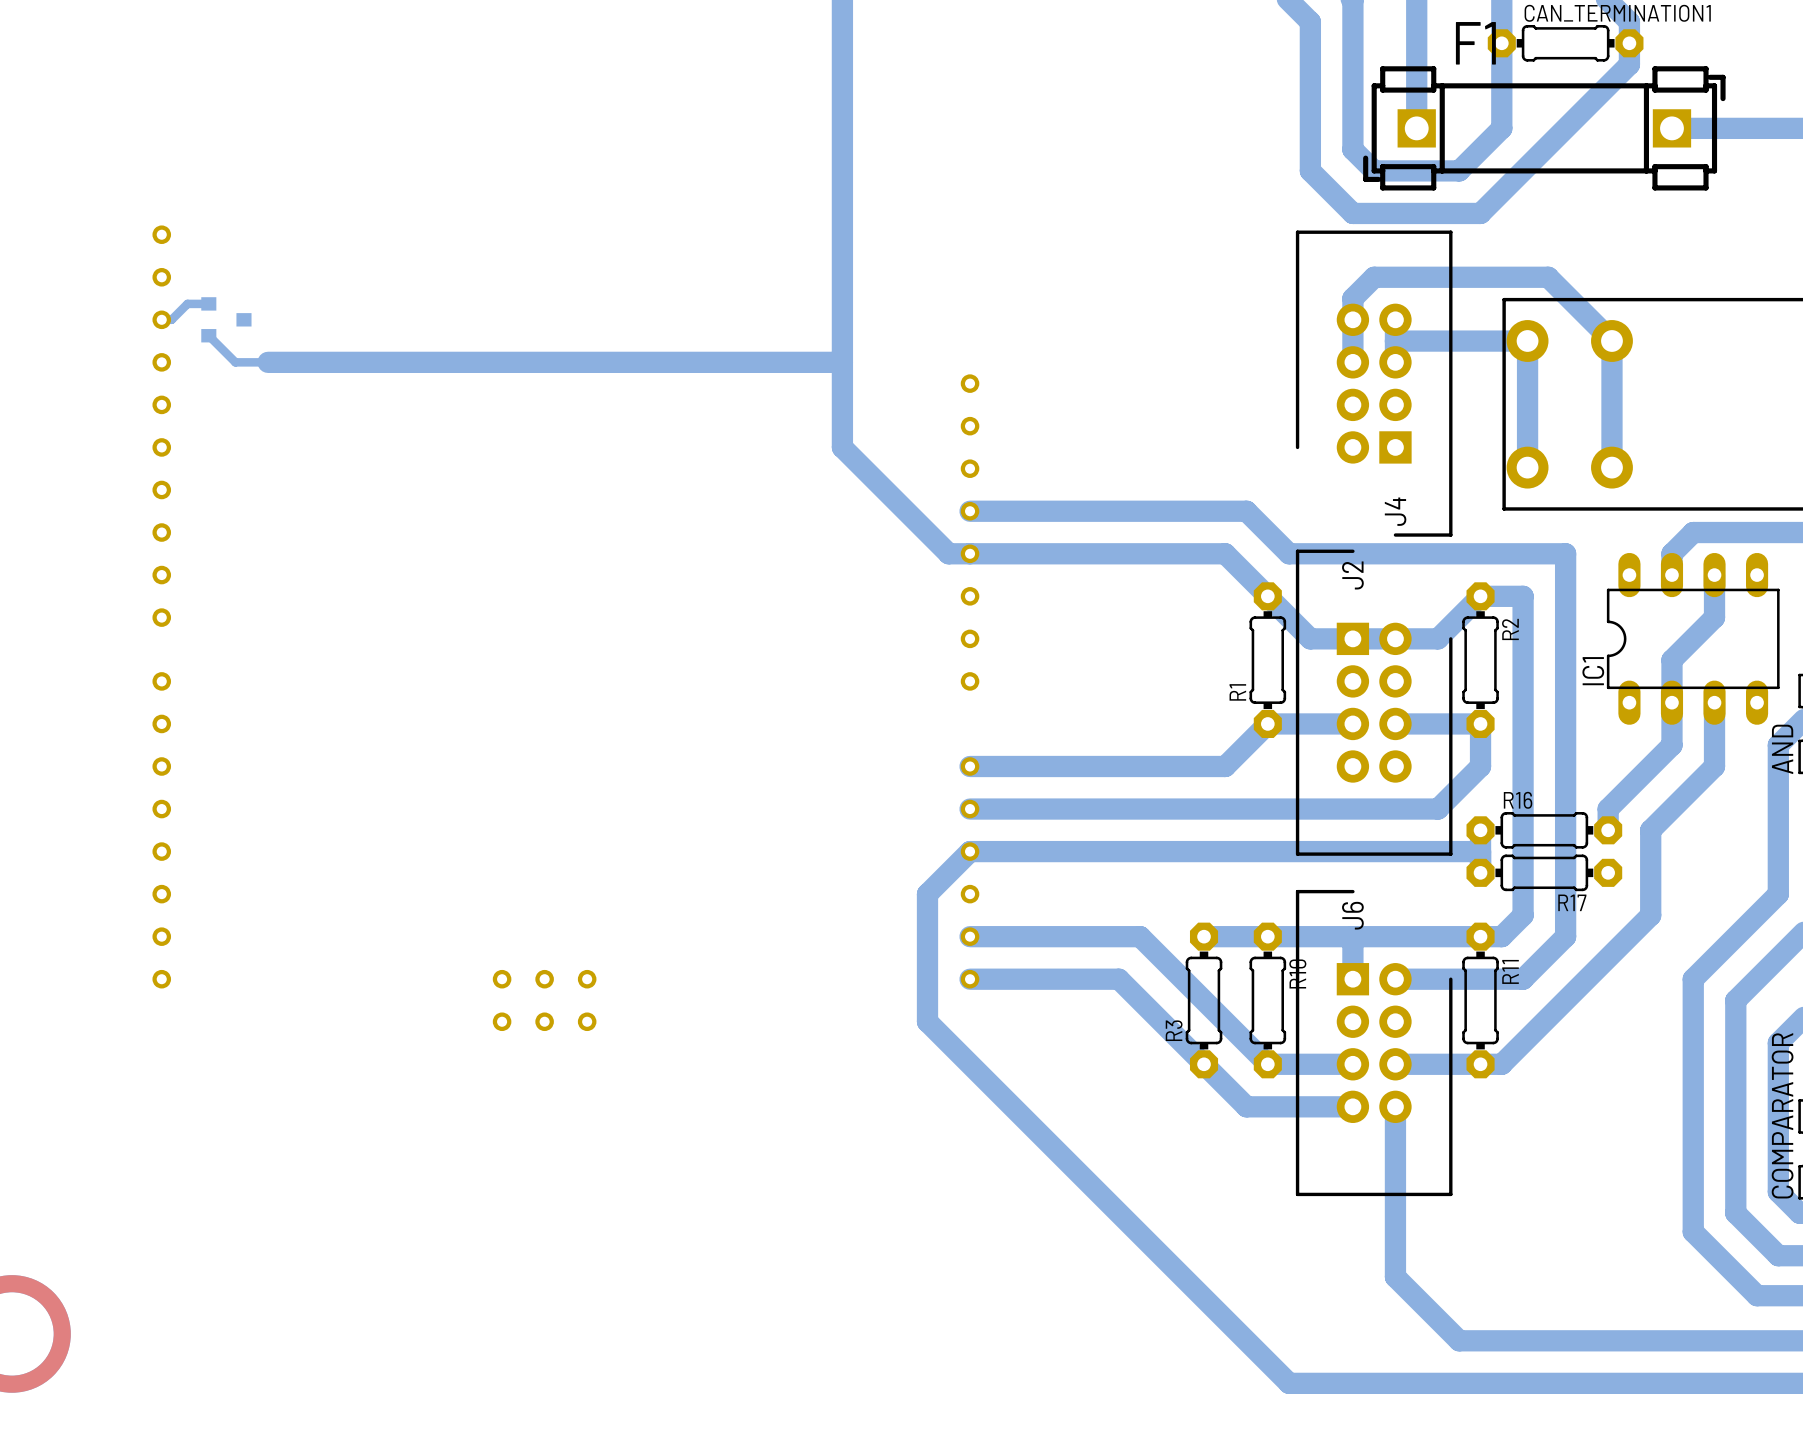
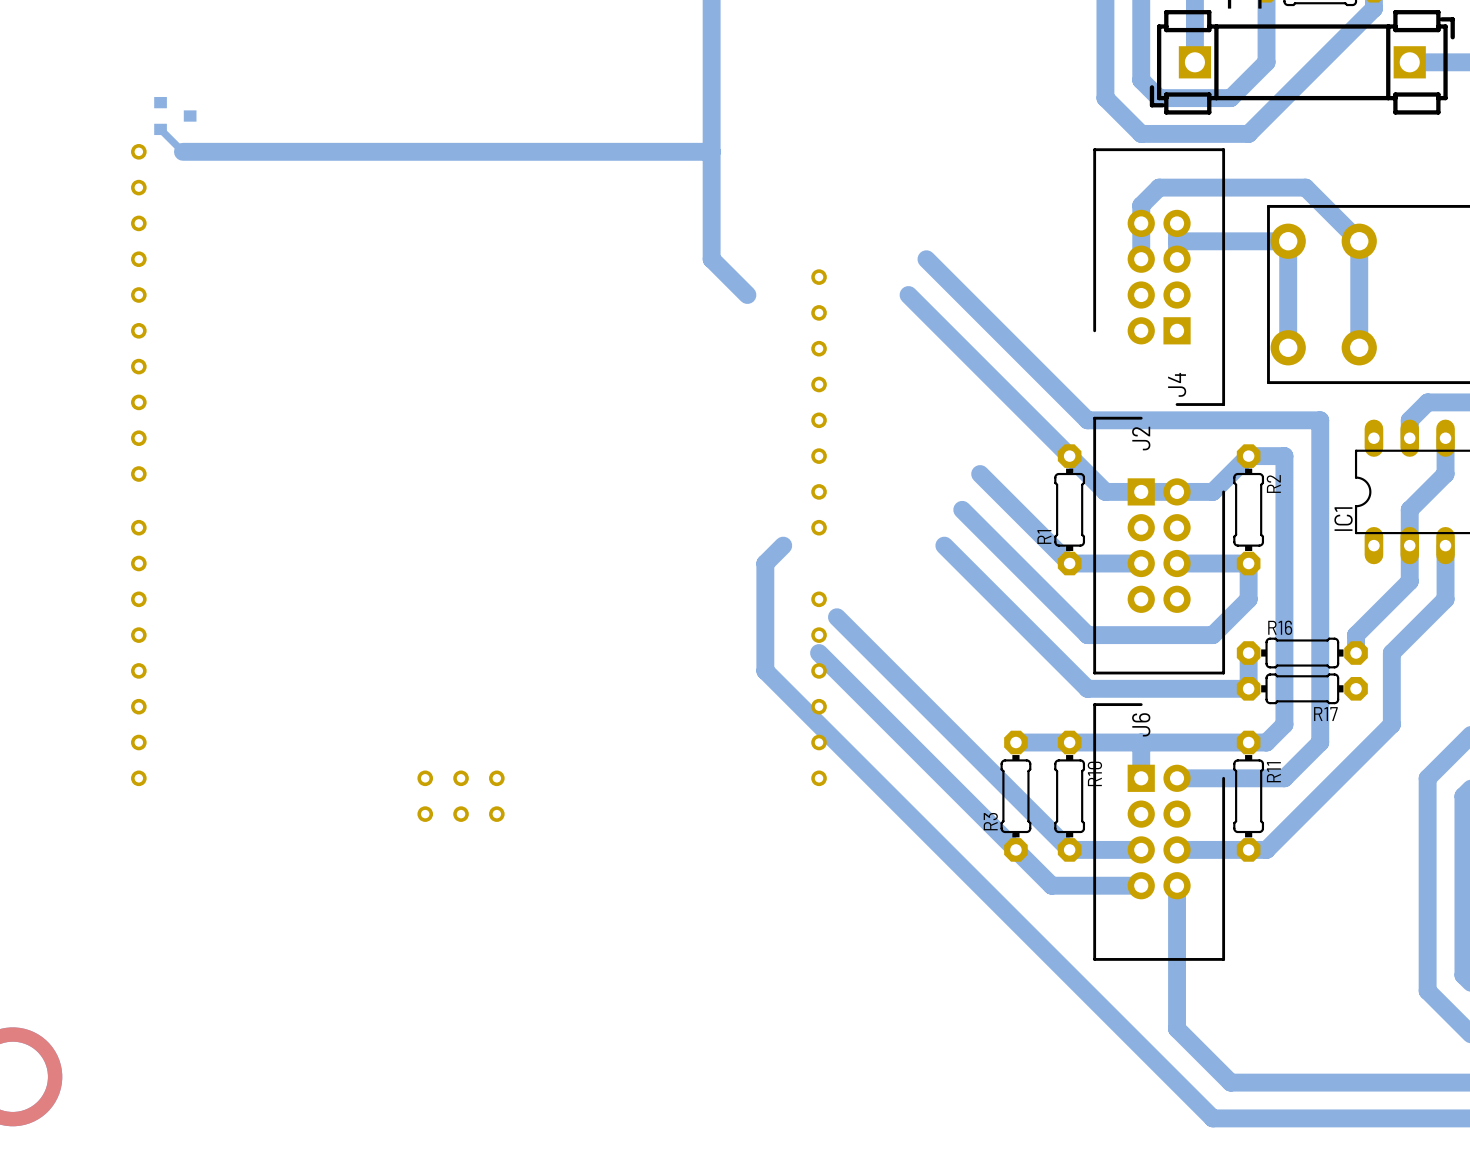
bottom track: none -> (160, 129) (182, 151) (711, 151)
bottom track: (208, 303) (187, 303) (171, 319) (161, 319) -> none
part position: (226, 319) -> (175, 116)
bottom track: (208, 335) (235, 362) (842, 362) (842, 447) (948, 553) (1225, 553) -> (908, 295) (1033, 420)
bottom track: none -> (711, 259) (747, 295)
bottom track: (970, 511) (1246, 511) -> (926, 259) (1051, 384)
bottom track: none -> (944, 545) (1087, 688) (1248, 688)
bottom track: (1267, 723) (1225, 766) (970, 766) -> (1069, 563) (980, 474)
bottom track: (970, 809) (1289, 809) -> (962, 509) (1087, 635)
bottom track: (1480, 851) (970, 851) (927, 894) (927, 1021) (1289, 1383) (1438, 1383) -> (783, 545) (765, 563) (765, 670) (1212, 1118)
bottom track: (970, 936) (1140, 936) -> (836, 617) (962, 742)
bottom track: (970, 979) (1118, 979) -> (819, 653) (944, 778)

